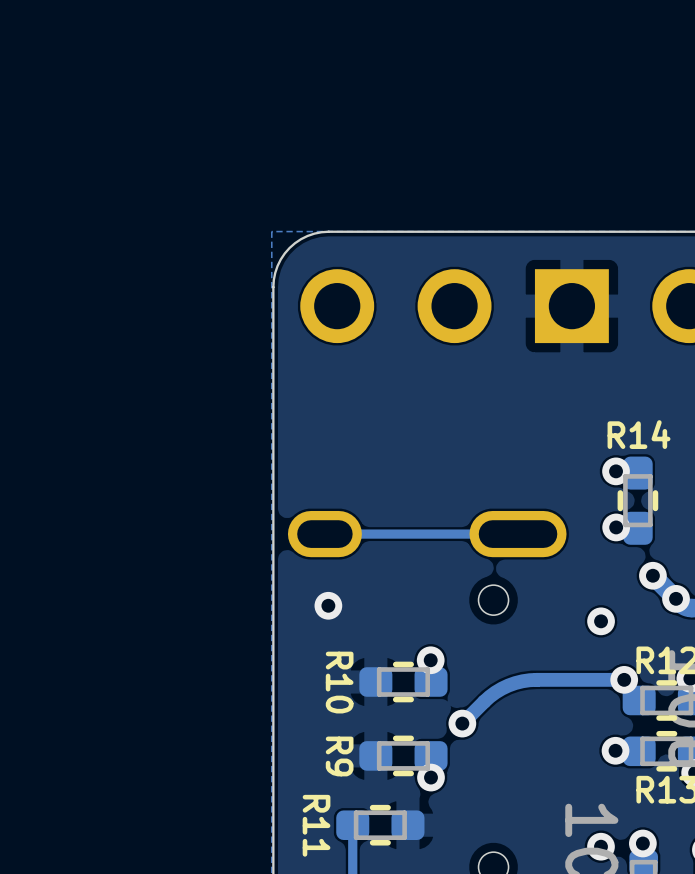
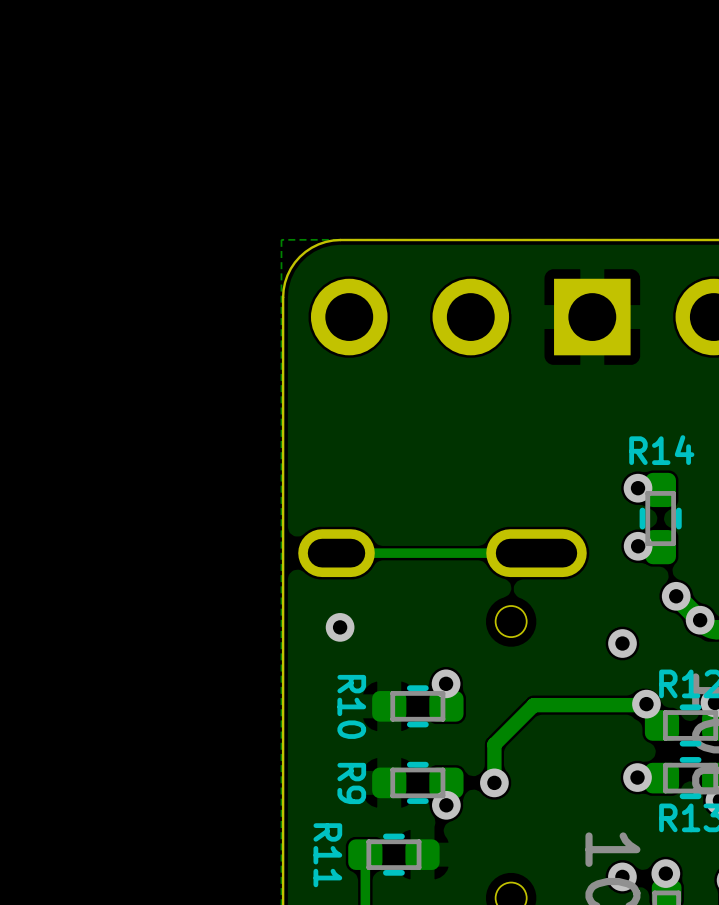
track: (624, 679) (536, 679) (515, 683) (489, 696) (462, 723) -> none
track: none -> (644, 705) (533, 705) (494, 744) (494, 782)
via position: (462, 723) -> (494, 782)

